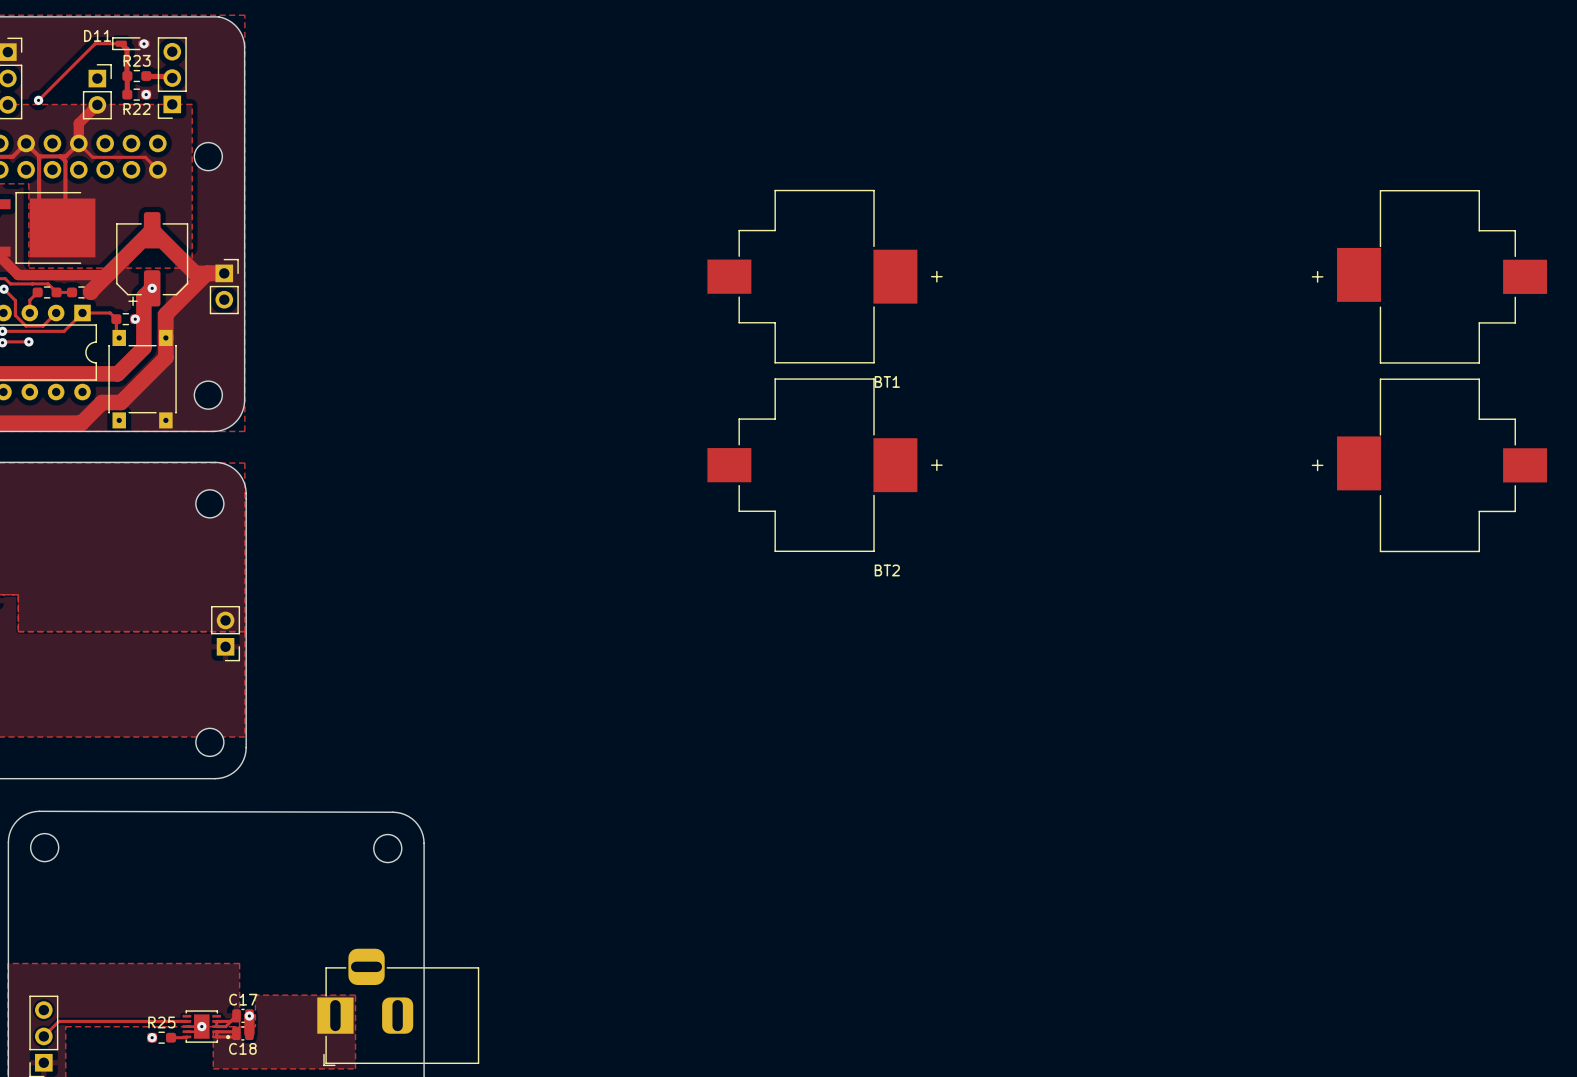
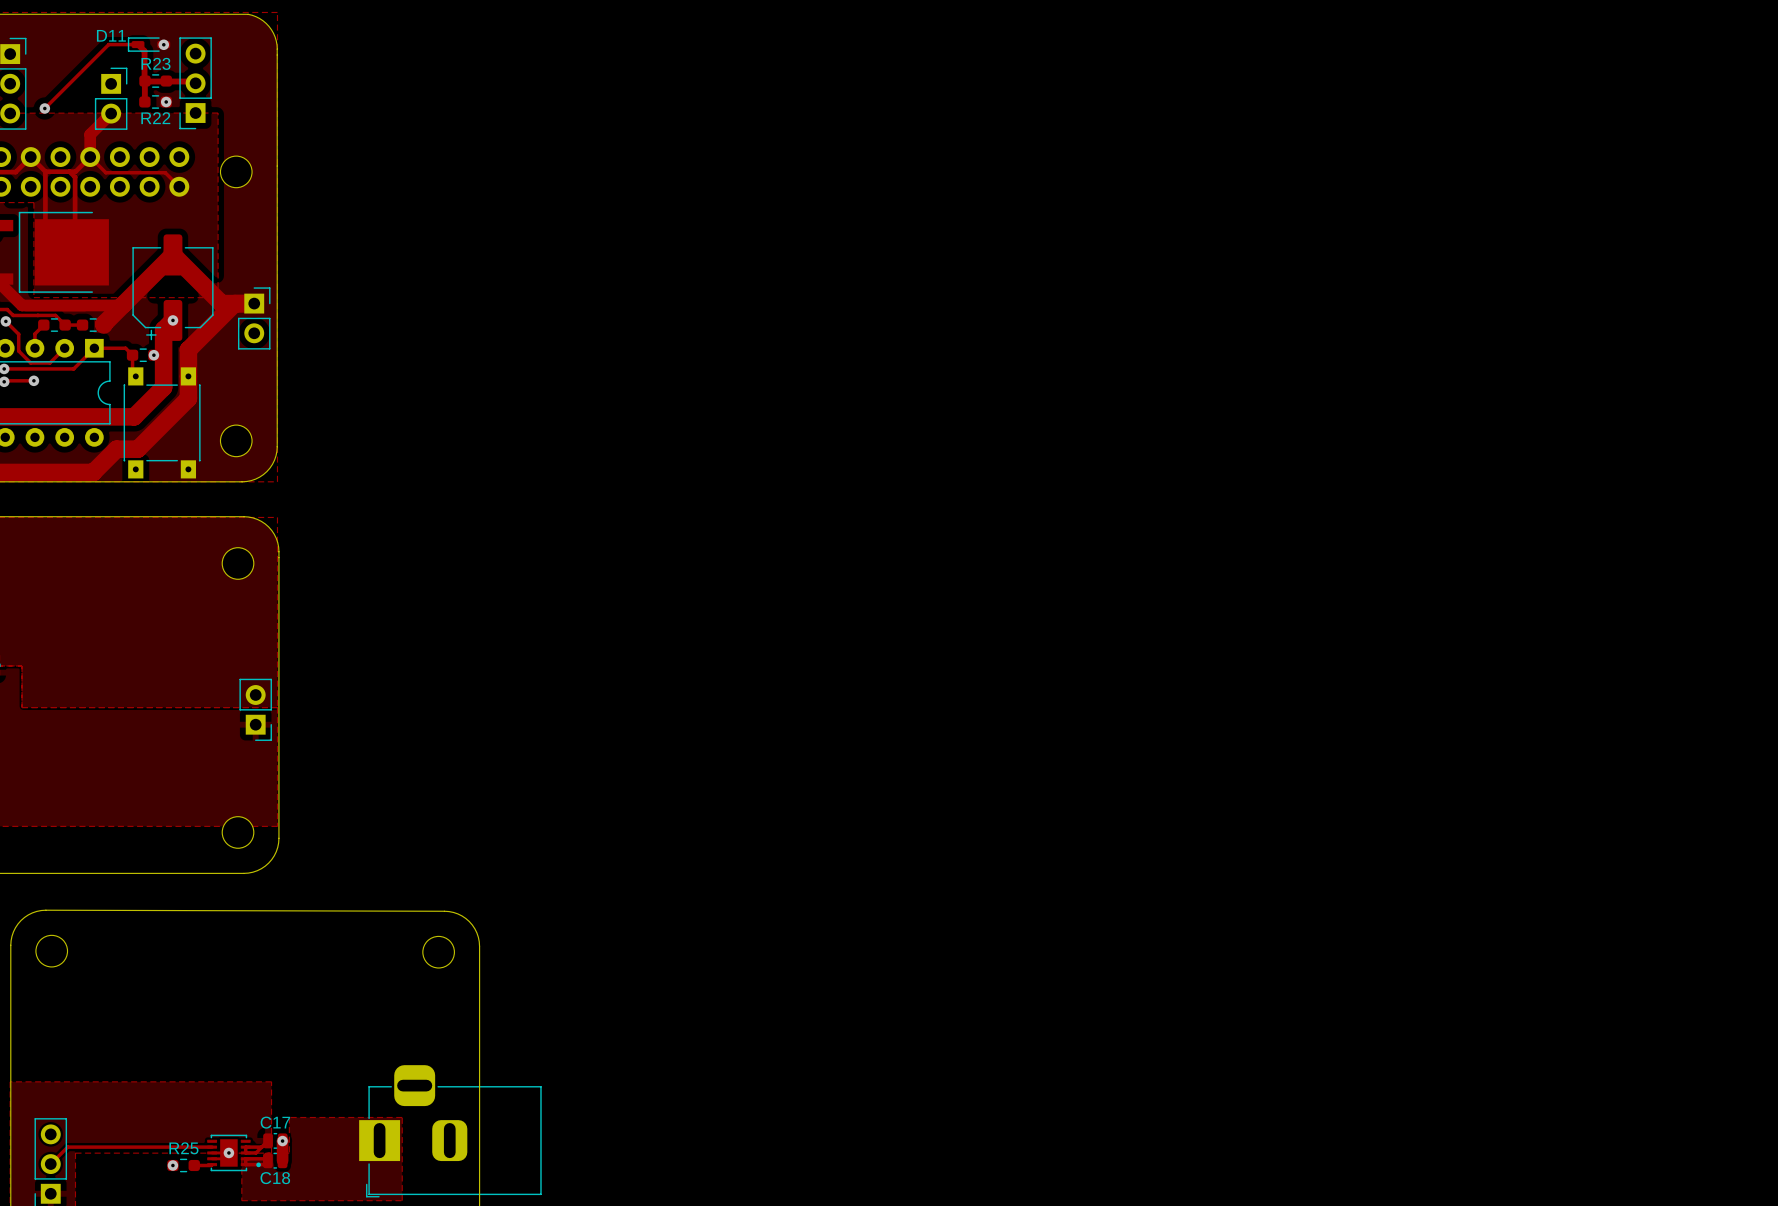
track: none -> (144, 81) (165, 81)
BT1: (1127, 276) -> none
BT2: (1127, 465) -> none

